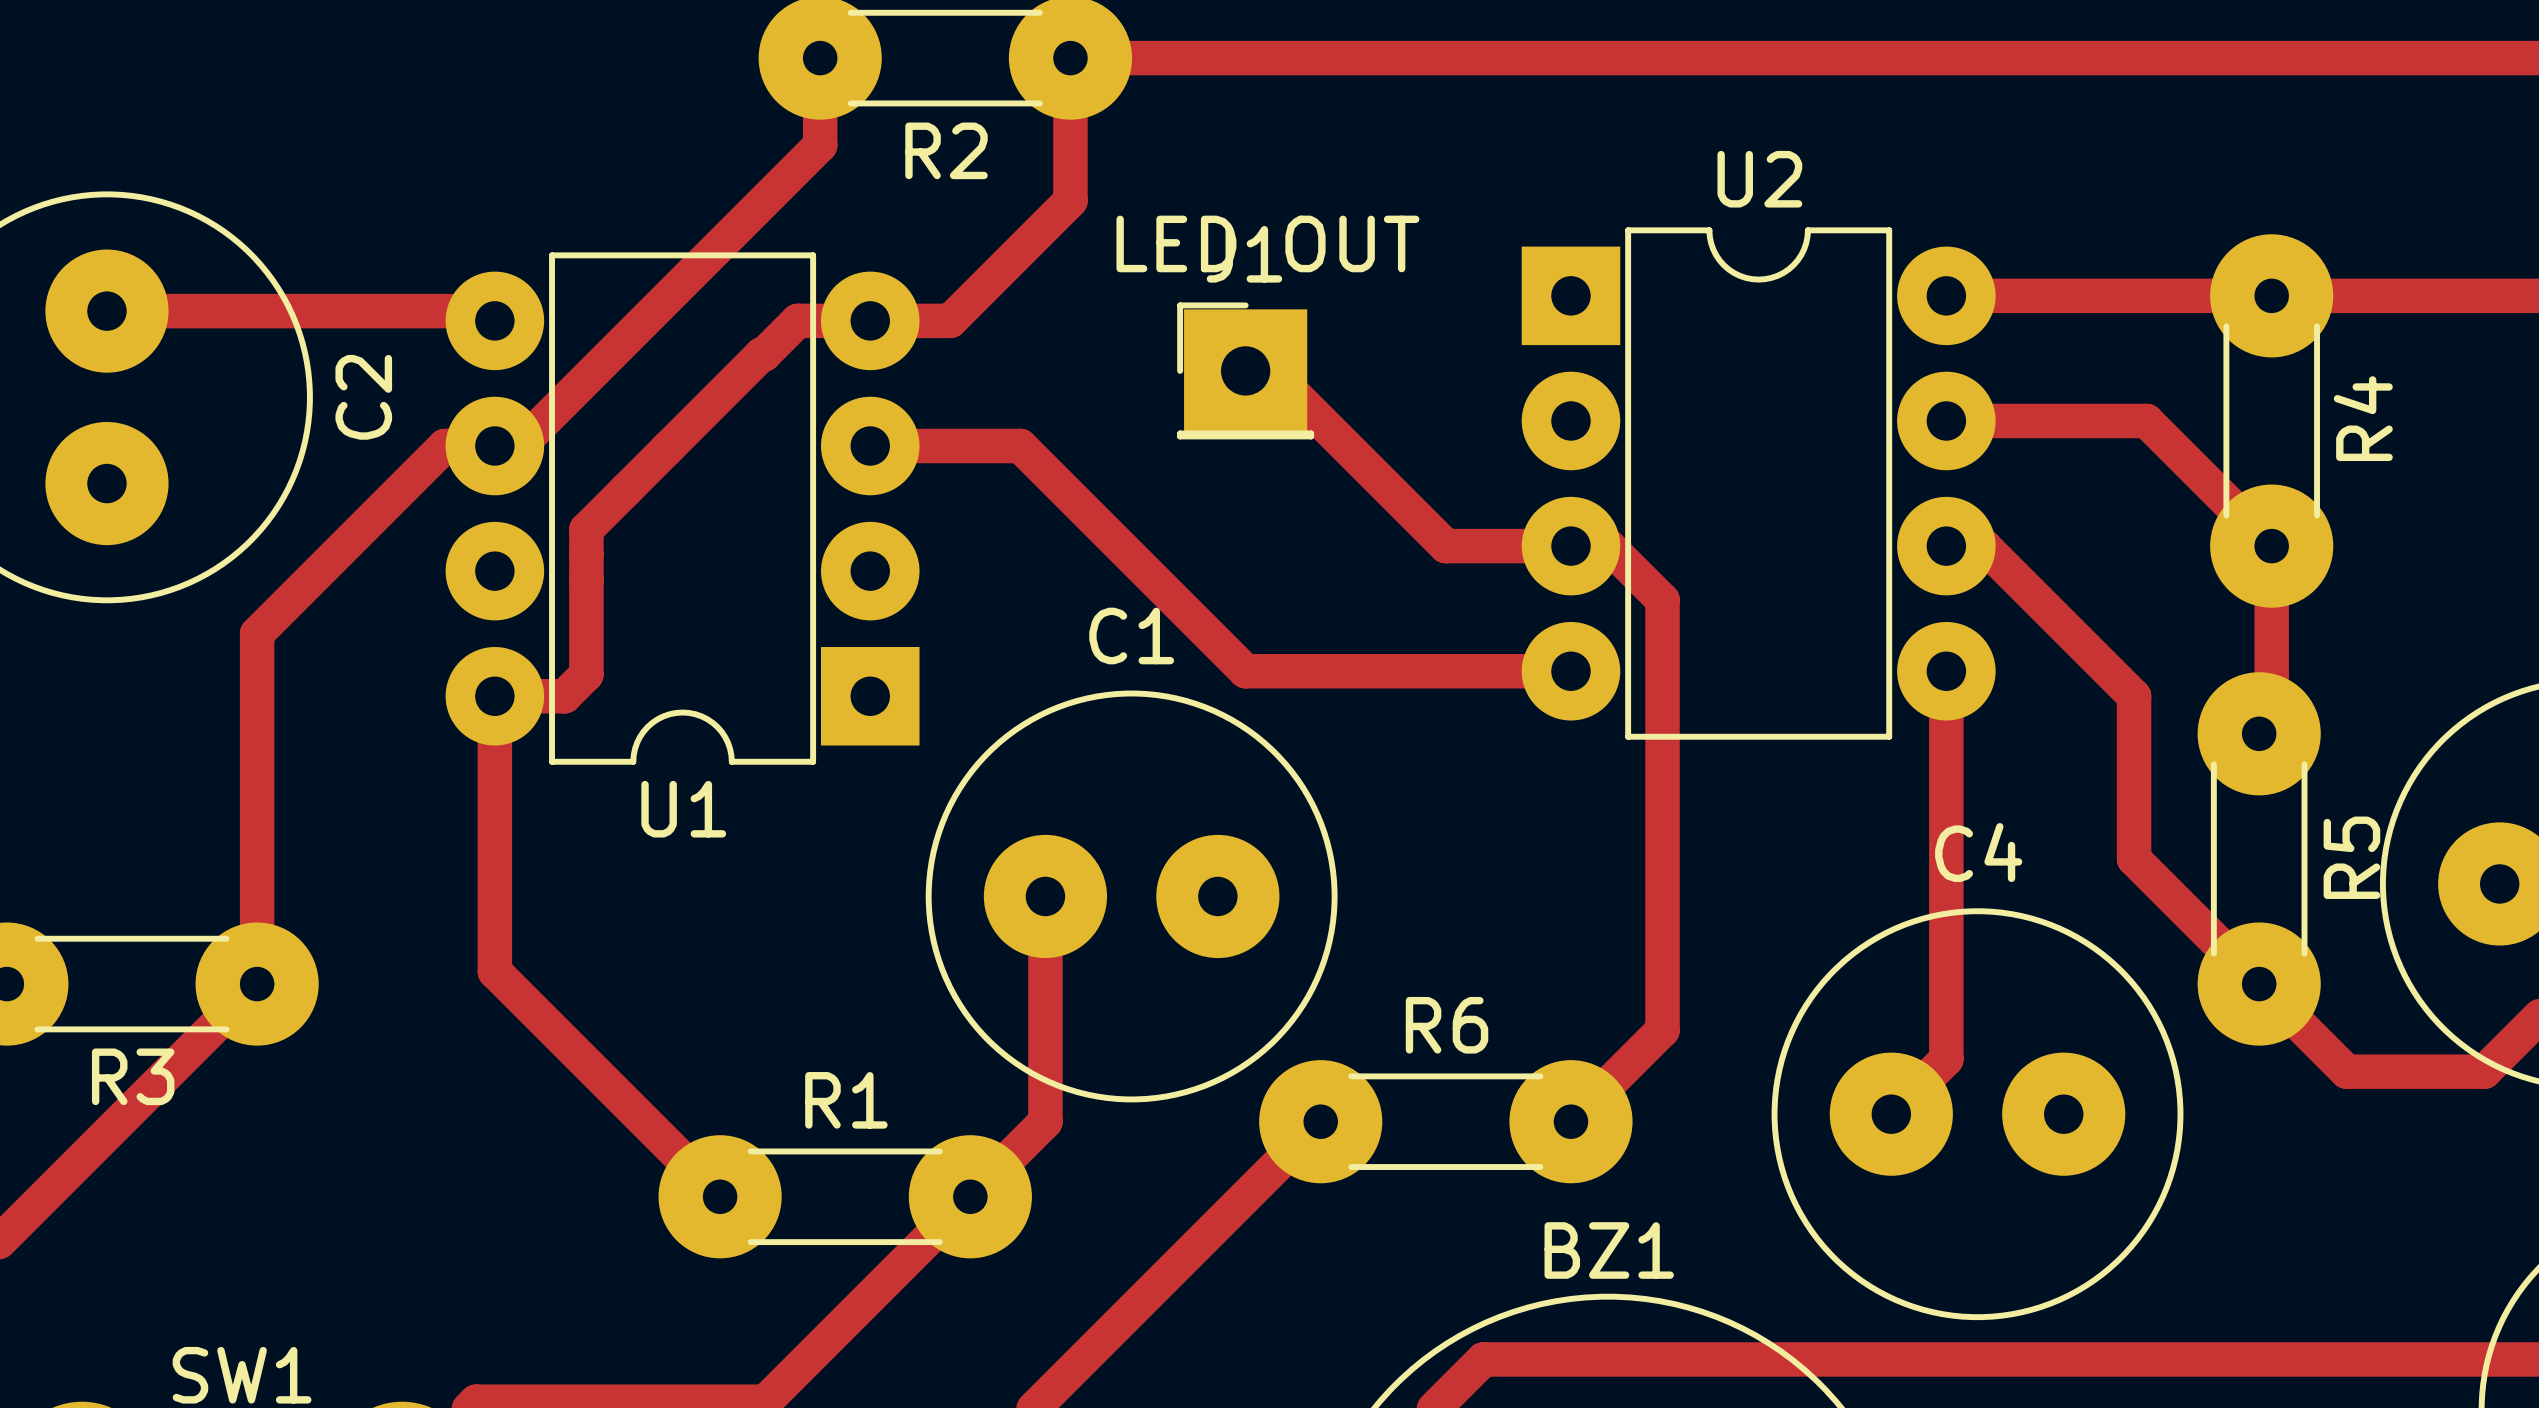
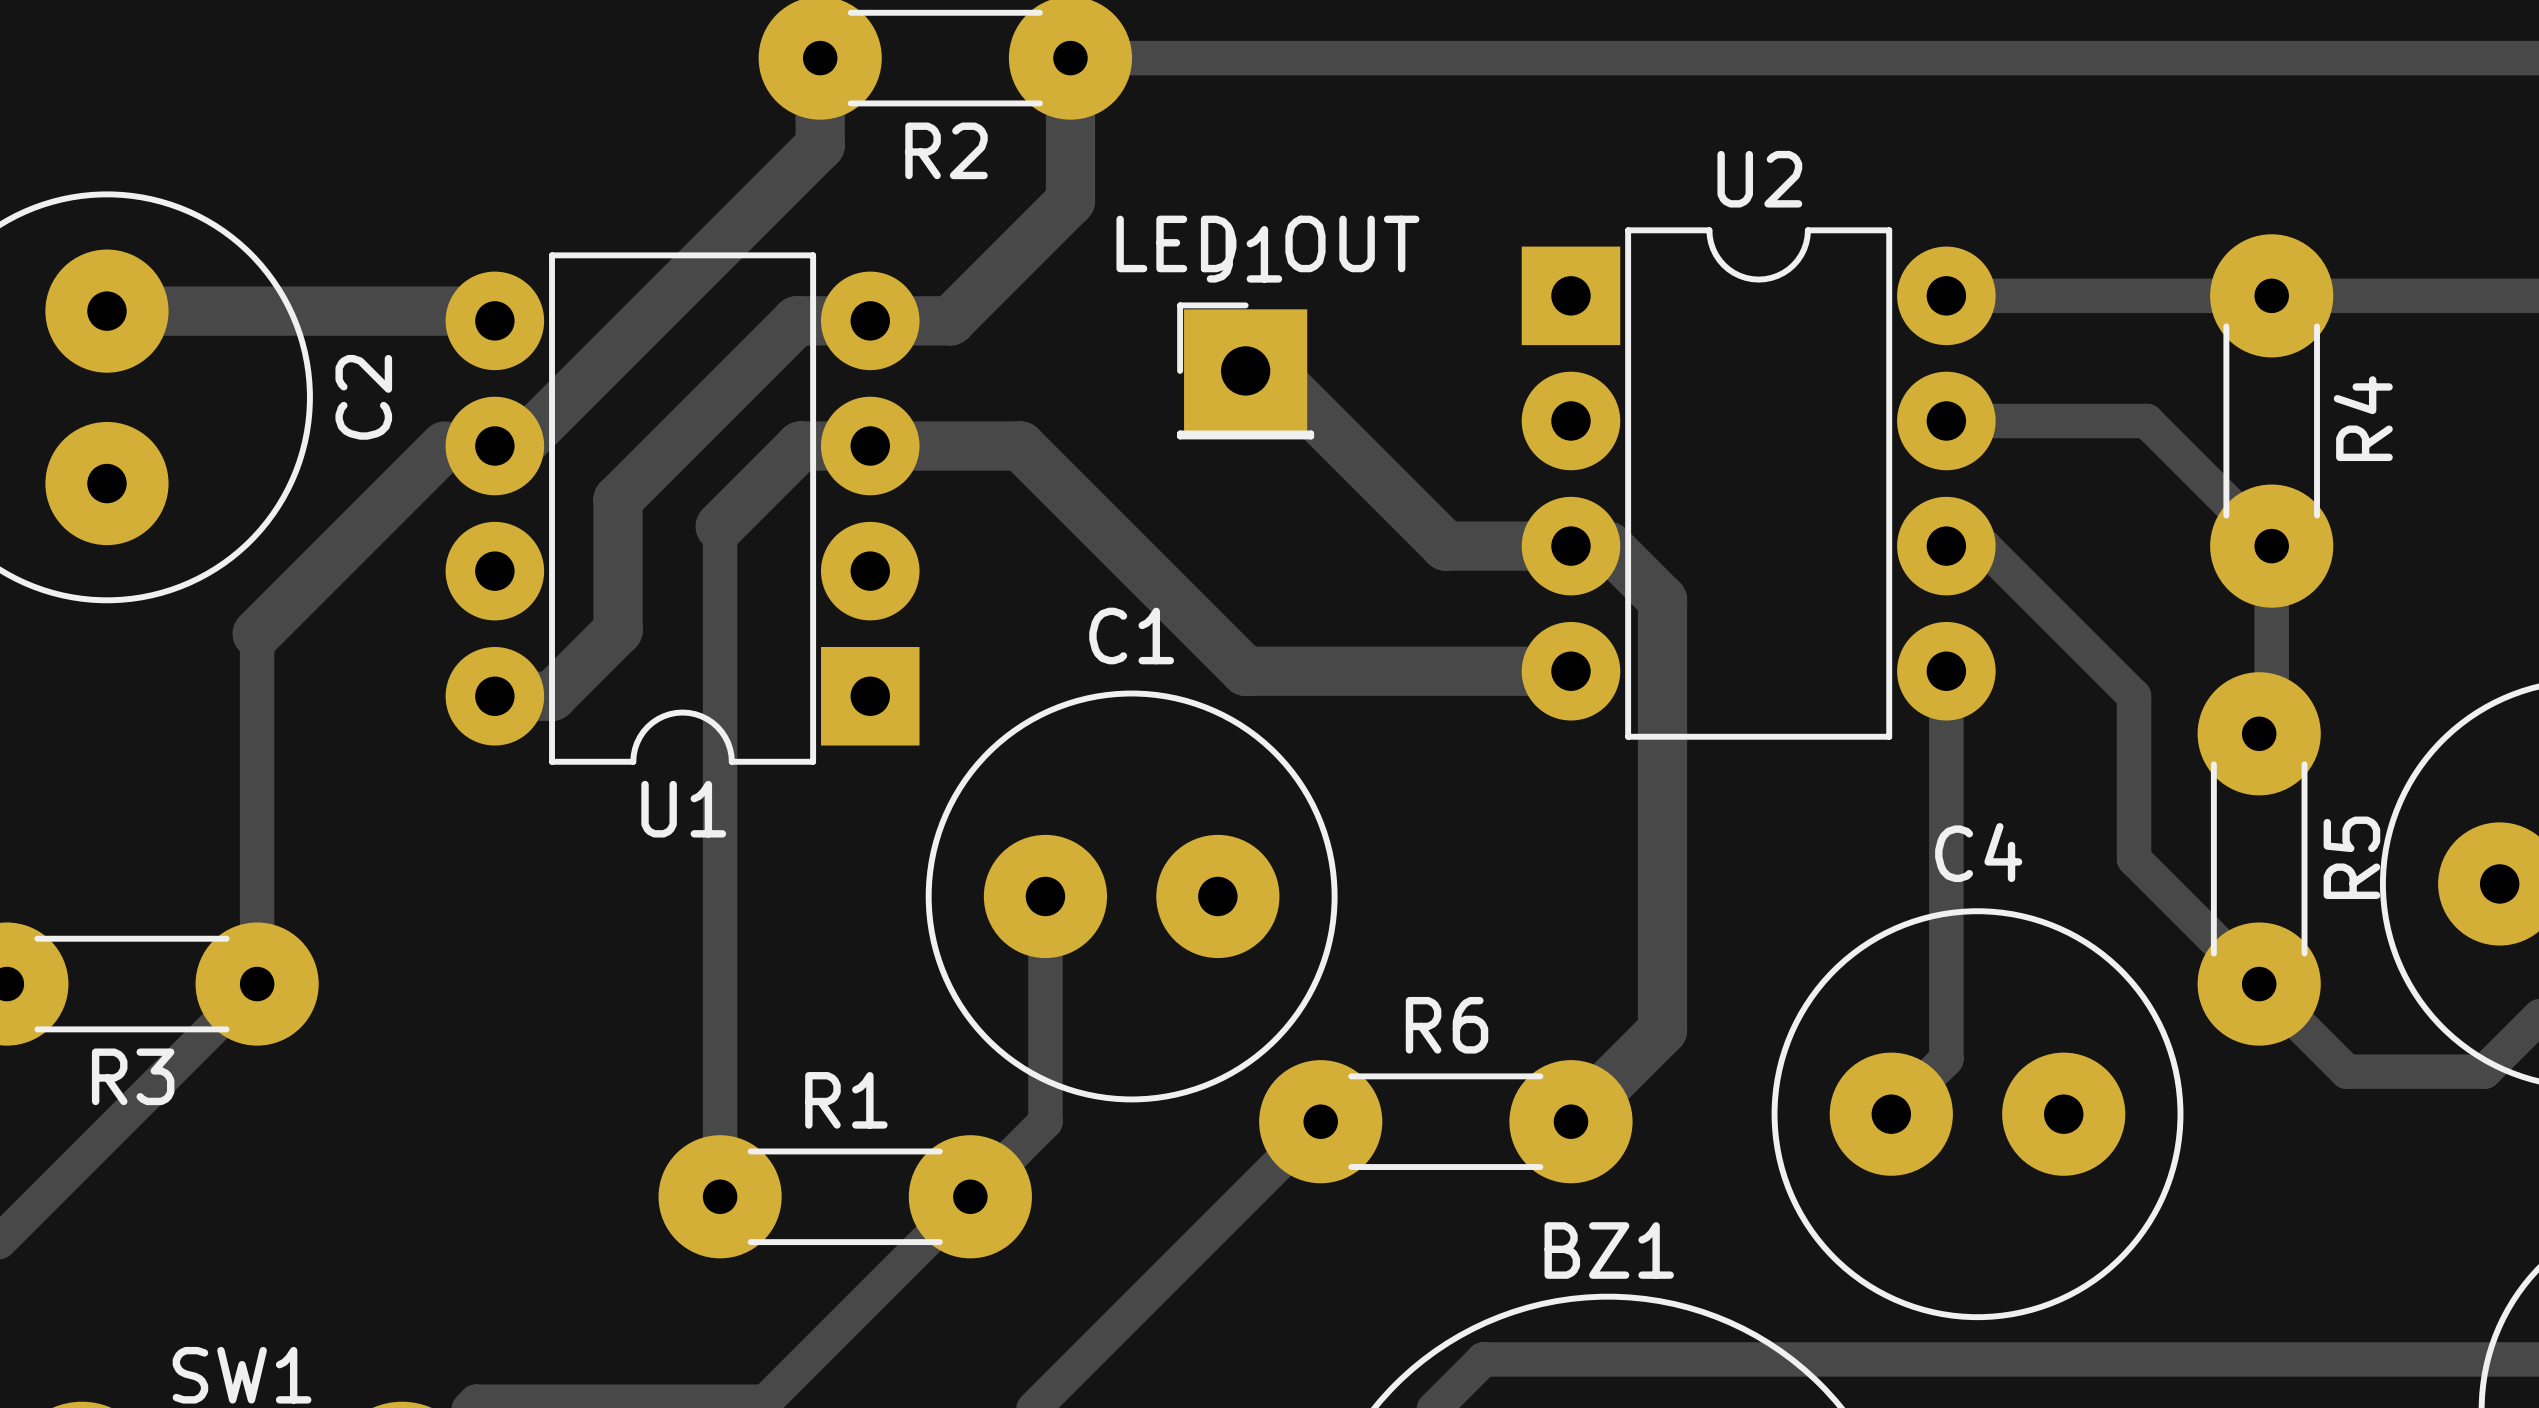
track width: thin (820, 58) (820, 145) (519, 446) (494, 446) -> thick (820, 58) (820, 145) (519, 446) (494, 446)
track width: thin (1070, 58) (1070, 200) (950, 320) (797, 320) -> thick (1070, 58) (1070, 200) (950, 320) (797, 320)
track width: thin (106, 311) (485, 311) -> thick (106, 311) (485, 311)
track: (797, 320) (586, 529) (586, 674) (564, 696) (552, 696) -> (796, 320) (618, 499) (618, 630) (552, 696)
track width: thin (1245, 370) (1270, 370) (1445, 546) (1570, 546) -> thick (1245, 370) (1270, 370) (1445, 546) (1570, 546)
track width: thin (444, 446) (257, 633) -> thick (444, 446) (257, 633)
track width: thin (870, 446) (1020, 446) (1245, 671) (1570, 671) -> thick (870, 446) (1020, 446) (1245, 671) (1570, 671)
track width: thin (1608, 546) (1662, 600) (1662, 1030) (1570, 1121) -> thick (1608, 546) (1662, 600) (1662, 1030) (1570, 1121)
track: (494, 696) (494, 971) (720, 1196) -> (870, 446) (800, 446) (720, 526) (720, 1196)

